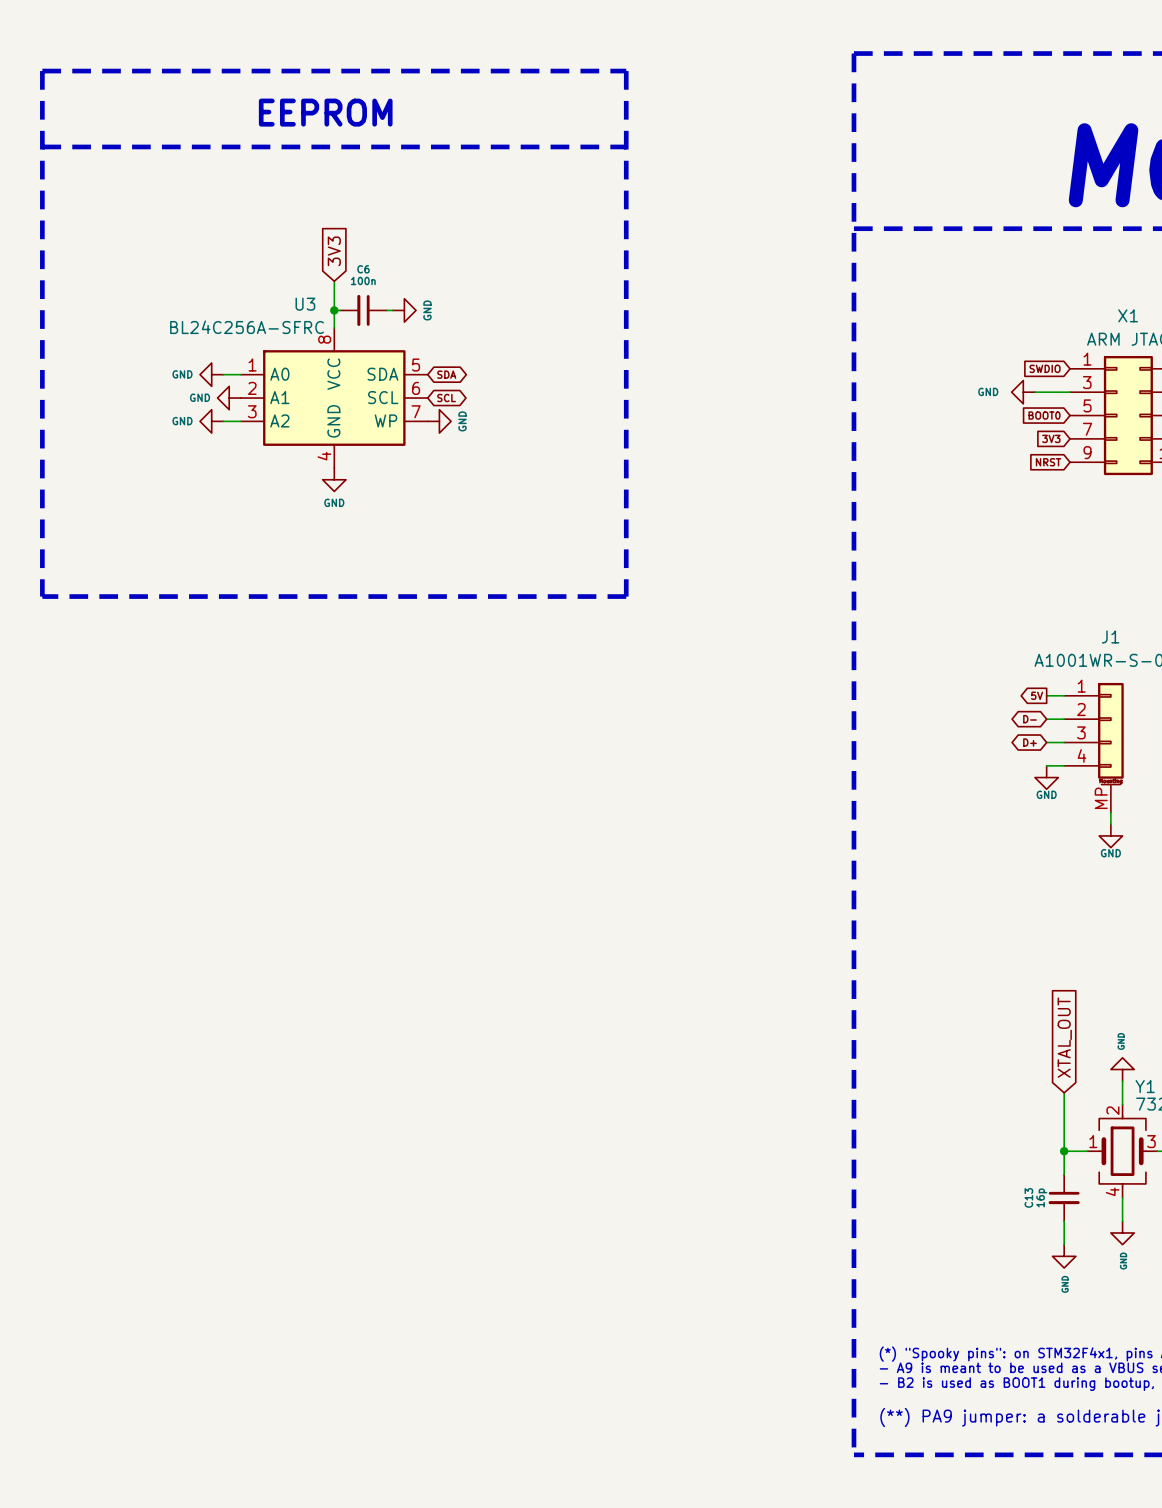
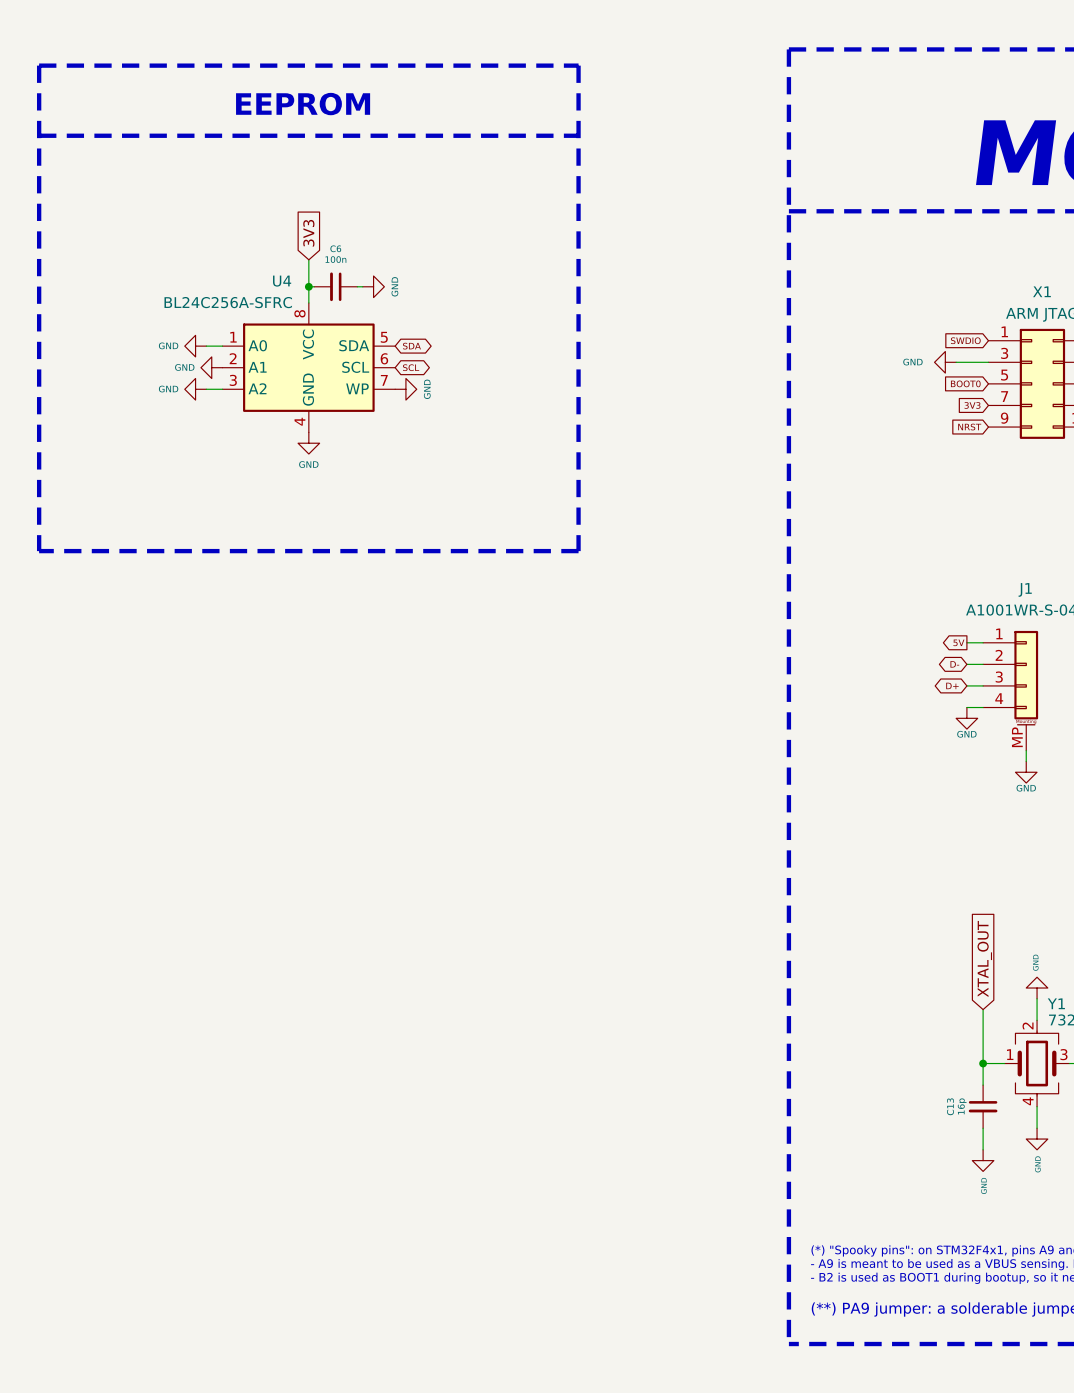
U3 name: U3 (305, 304) -> U4 (282, 281)

